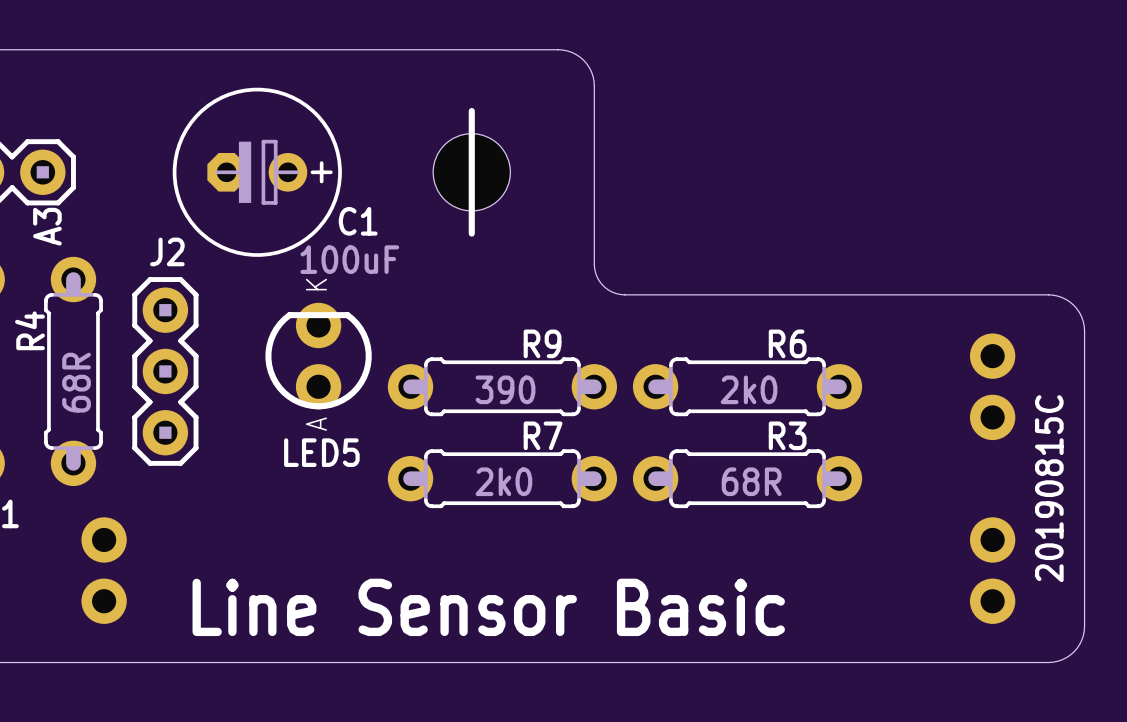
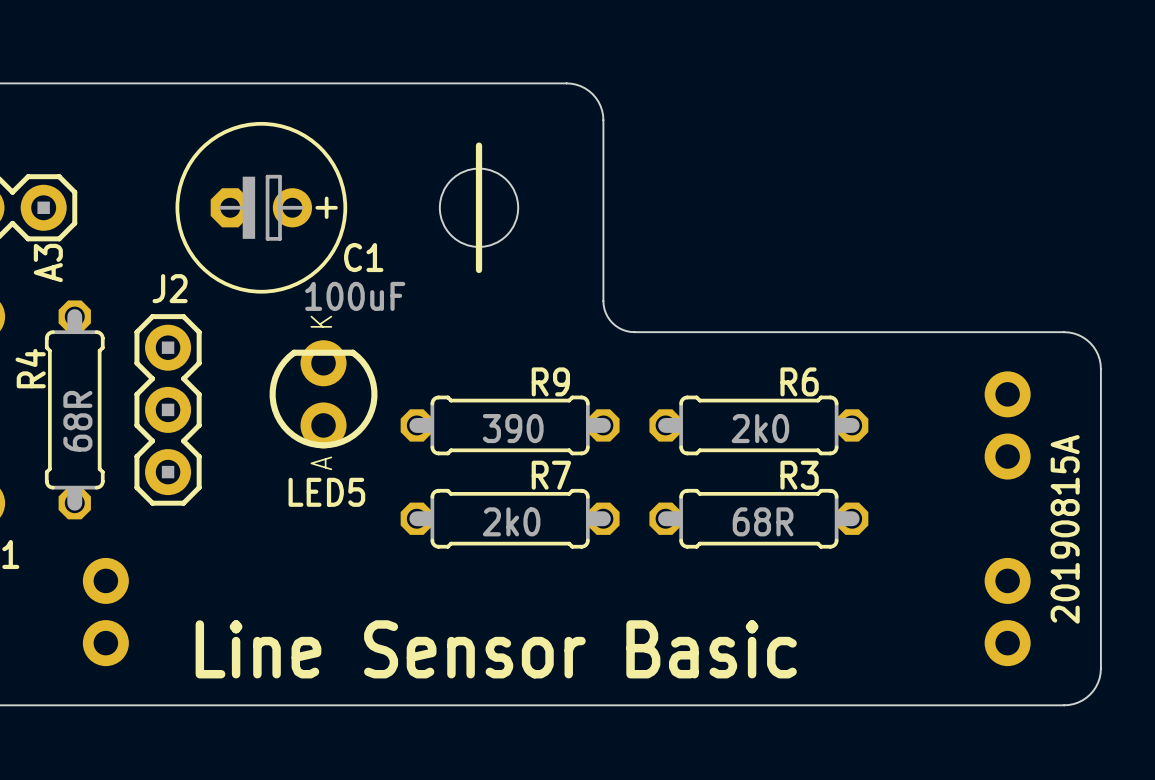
R4 footprint: [44, 256, 103, 487] -> [44, 300, 105, 520]
R9 footprint: [387, 357, 618, 417] -> [400, 395, 620, 456]
R6 footprint: [632, 357, 863, 417] -> [649, 395, 869, 456]
R7 footprint: [387, 449, 618, 509] -> [400, 488, 620, 549]
R3 footprint: [632, 449, 863, 509] -> [649, 488, 869, 549]
text: 20190815C (1049, 488) -> 20190815A (1065, 529)

